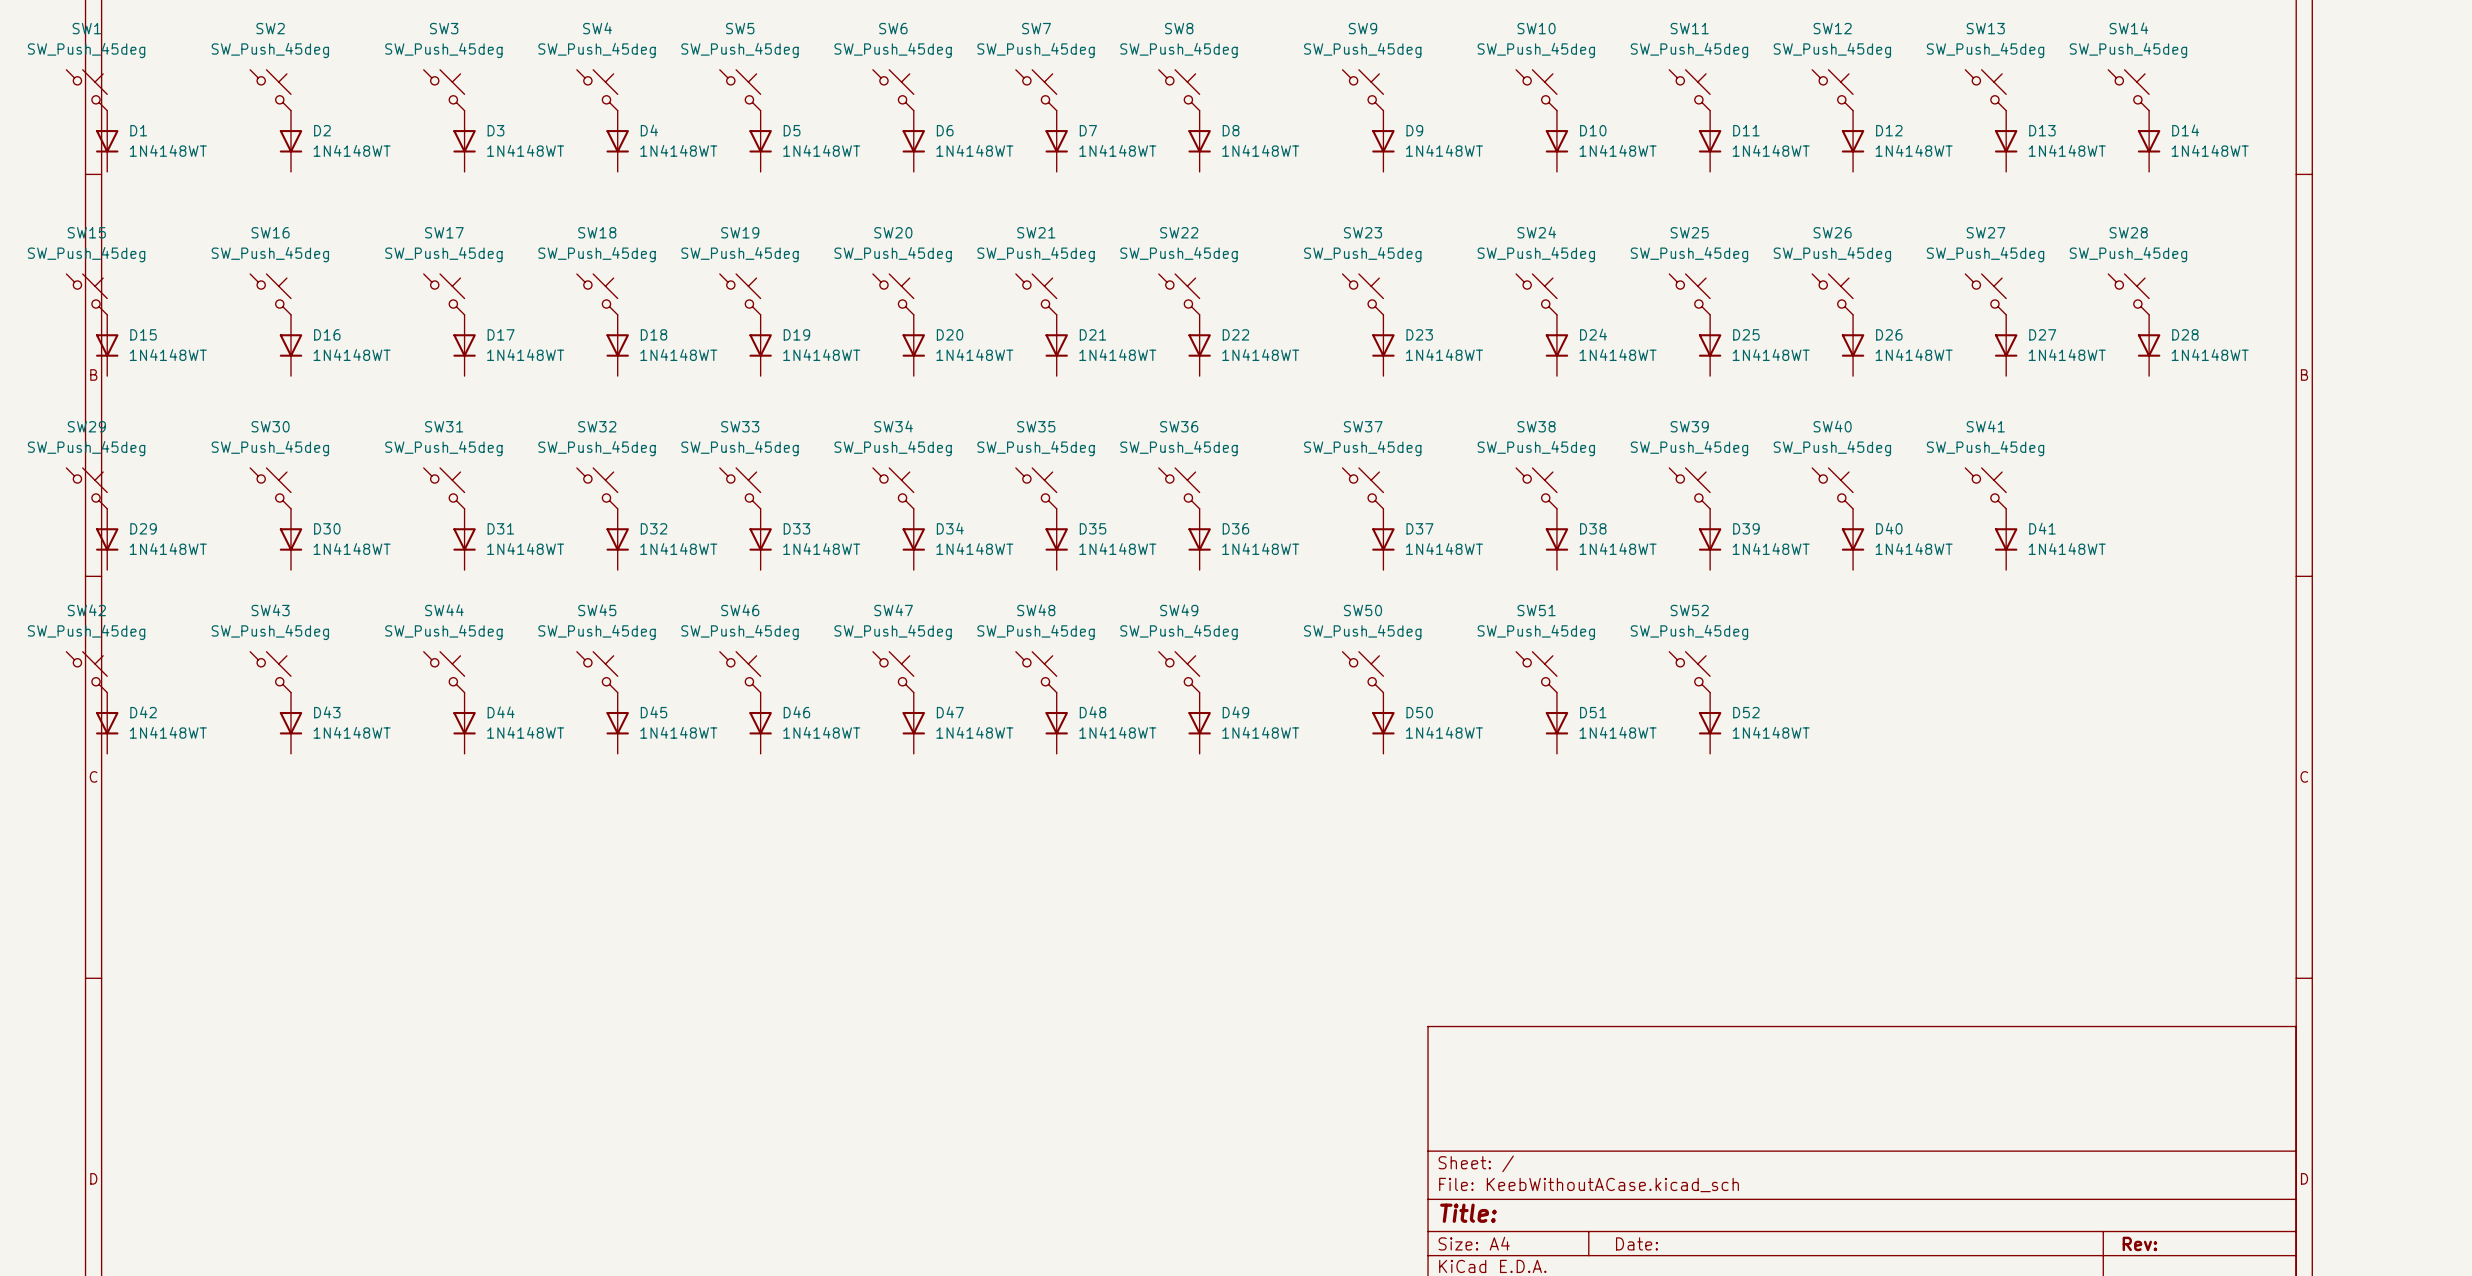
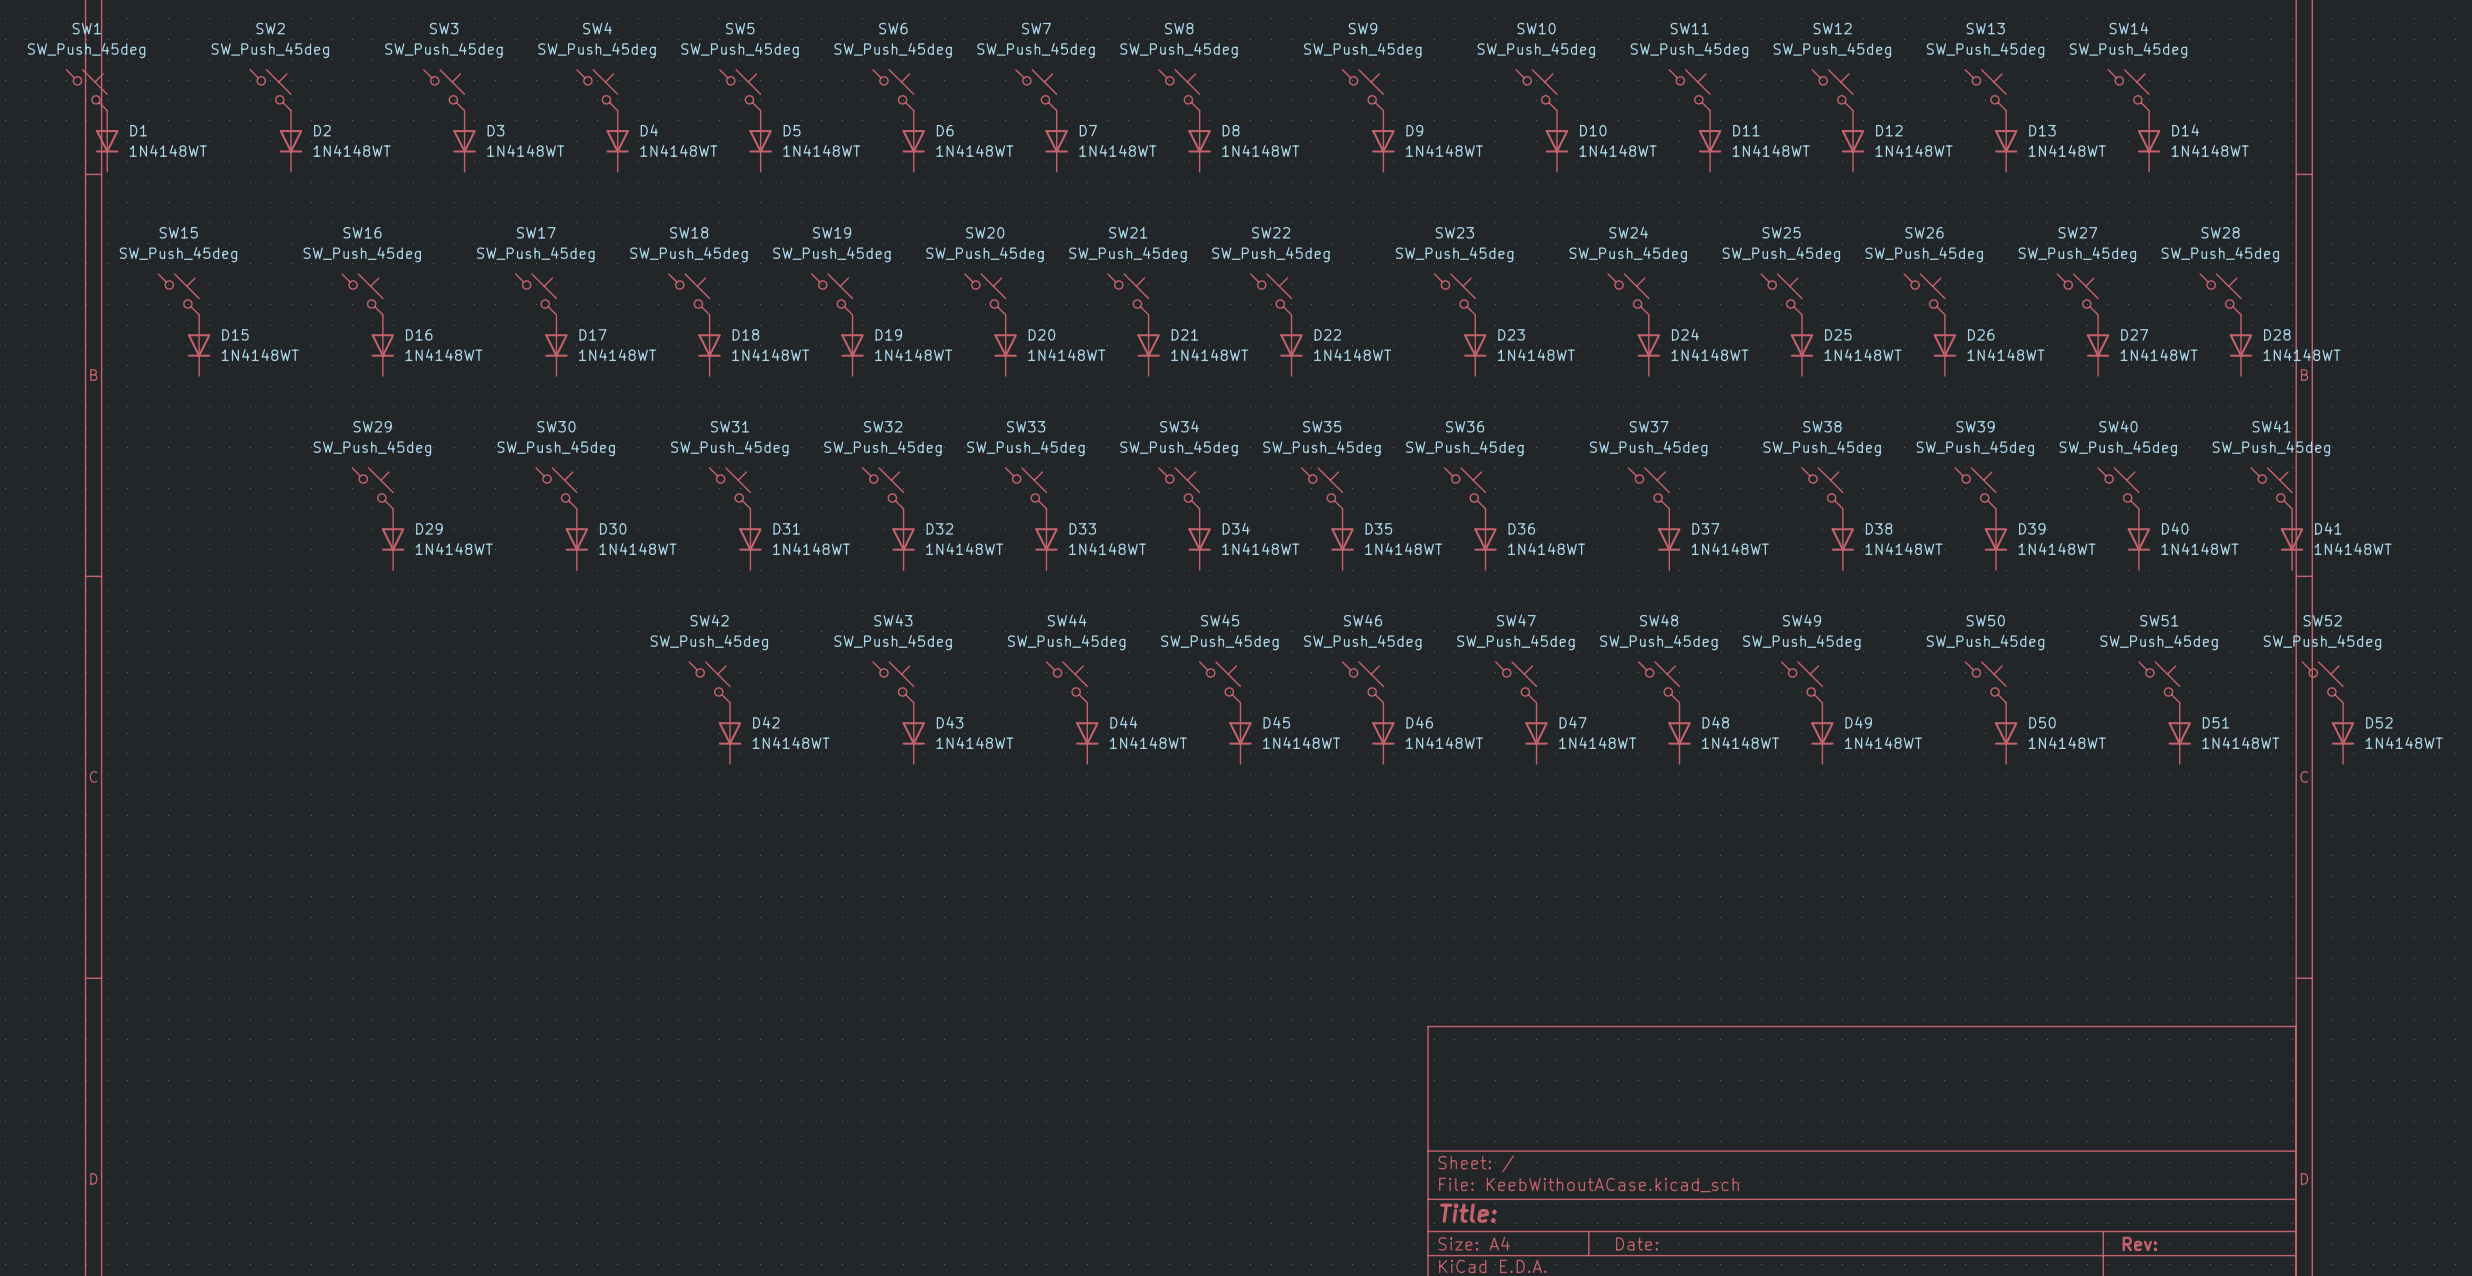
SW15 position: (86, 294) -> (178, 294)
SW16 position: (270, 294) -> (362, 294)
SW17 position: (444, 294) -> (536, 294)
SW18 position: (597, 294) -> (689, 294)
SW19 position: (740, 294) -> (832, 294)
SW20 position: (893, 294) -> (985, 294)
SW21 position: (1036, 294) -> (1128, 294)
SW22 position: (1179, 294) -> (1271, 294)
SW23 position: (1362, 294) -> (1454, 294)
SW24 position: (1536, 294) -> (1628, 294)
SW25 position: (1689, 294) -> (1781, 294)
SW26 position: (1832, 294) -> (1924, 294)
SW27 position: (1985, 294) -> (2077, 294)
SW28 position: (2128, 294) -> (2220, 294)
D15 position: (107, 345) -> (199, 345)
D16 position: (291, 345) -> (382, 345)
D17 position: (464, 345) -> (556, 345)
D18 position: (617, 345) -> (709, 345)
D19 position: (760, 345) -> (852, 345)
D20 position: (913, 345) -> (1005, 345)
D21 position: (1056, 345) -> (1148, 345)
D22 position: (1199, 345) -> (1291, 345)
D23 position: (1383, 345) -> (1475, 345)
D24 position: (1556, 345) -> (1648, 345)
D25 position: (1710, 345) -> (1801, 345)
D26 position: (1853, 345) -> (1944, 345)
D27 position: (2006, 345) -> (2098, 345)
D28 position: (2149, 345) -> (2240, 345)
SW36 name: SW36 (1179, 426) -> SW34 (1179, 426)
SW29 position: (86, 488) -> (372, 488)
SW30 position: (270, 488) -> (556, 488)
SW31 position: (444, 488) -> (730, 488)
SW32 position: (597, 488) -> (883, 488)
SW33 position: (740, 488) -> (1026, 488)
SW34: SW_Push_45deg (893, 488) -> none
SW35 position: (1036, 488) -> (1322, 488)
SW37 position: (1362, 488) -> (1648, 488)
SW36: none -> SW_Push_45deg (1465, 488)
SW38 position: (1536, 488) -> (1822, 488)
SW39 position: (1689, 488) -> (1975, 488)
SW40 position: (1832, 488) -> (2118, 488)
SW41 position: (1985, 488) -> (2271, 488)
D36 name: D36 (1235, 528) -> D34 (1236, 528)
D29 position: (107, 539) -> (393, 539)
D30 position: (291, 539) -> (576, 539)
D31 position: (464, 539) -> (750, 539)
D32 position: (617, 539) -> (903, 539)
D33 position: (760, 539) -> (1046, 539)
D34: 1N4148WT (913, 539) -> none
D35 position: (1056, 539) -> (1342, 539)
D37 position: (1383, 539) -> (1669, 539)
D36: none -> 1N4148WT (1485, 539)
D38 position: (1556, 539) -> (1842, 539)
D39 position: (1710, 539) -> (1995, 539)
D40 position: (1853, 539) -> (2138, 539)
D41 position: (2006, 539) -> (2292, 539)
SW42 position: (86, 672) -> (709, 682)
SW43 position: (270, 672) -> (893, 682)
SW44 position: (444, 672) -> (1066, 682)
SW45 position: (597, 672) -> (1220, 682)
SW46 position: (740, 672) -> (1362, 682)
SW47 position: (893, 672) -> (1516, 682)
SW48 position: (1036, 672) -> (1659, 682)
SW49 position: (1179, 672) -> (1801, 682)
SW50 position: (1362, 672) -> (1985, 682)
SW51 position: (1536, 672) -> (2159, 682)
SW52 position: (1689, 672) -> (2322, 682)
D42 position: (107, 723) -> (730, 733)
D43 position: (291, 723) -> (913, 733)
D44 position: (464, 723) -> (1087, 733)
D45 position: (617, 723) -> (1240, 733)
D46 position: (760, 723) -> (1383, 733)
D47 position: (913, 723) -> (1536, 733)
D48 position: (1056, 723) -> (1679, 733)
D49 position: (1199, 723) -> (1822, 733)
D50 position: (1383, 723) -> (2006, 733)
D51 position: (1556, 723) -> (2179, 733)
D52 position: (1710, 723) -> (2343, 733)

